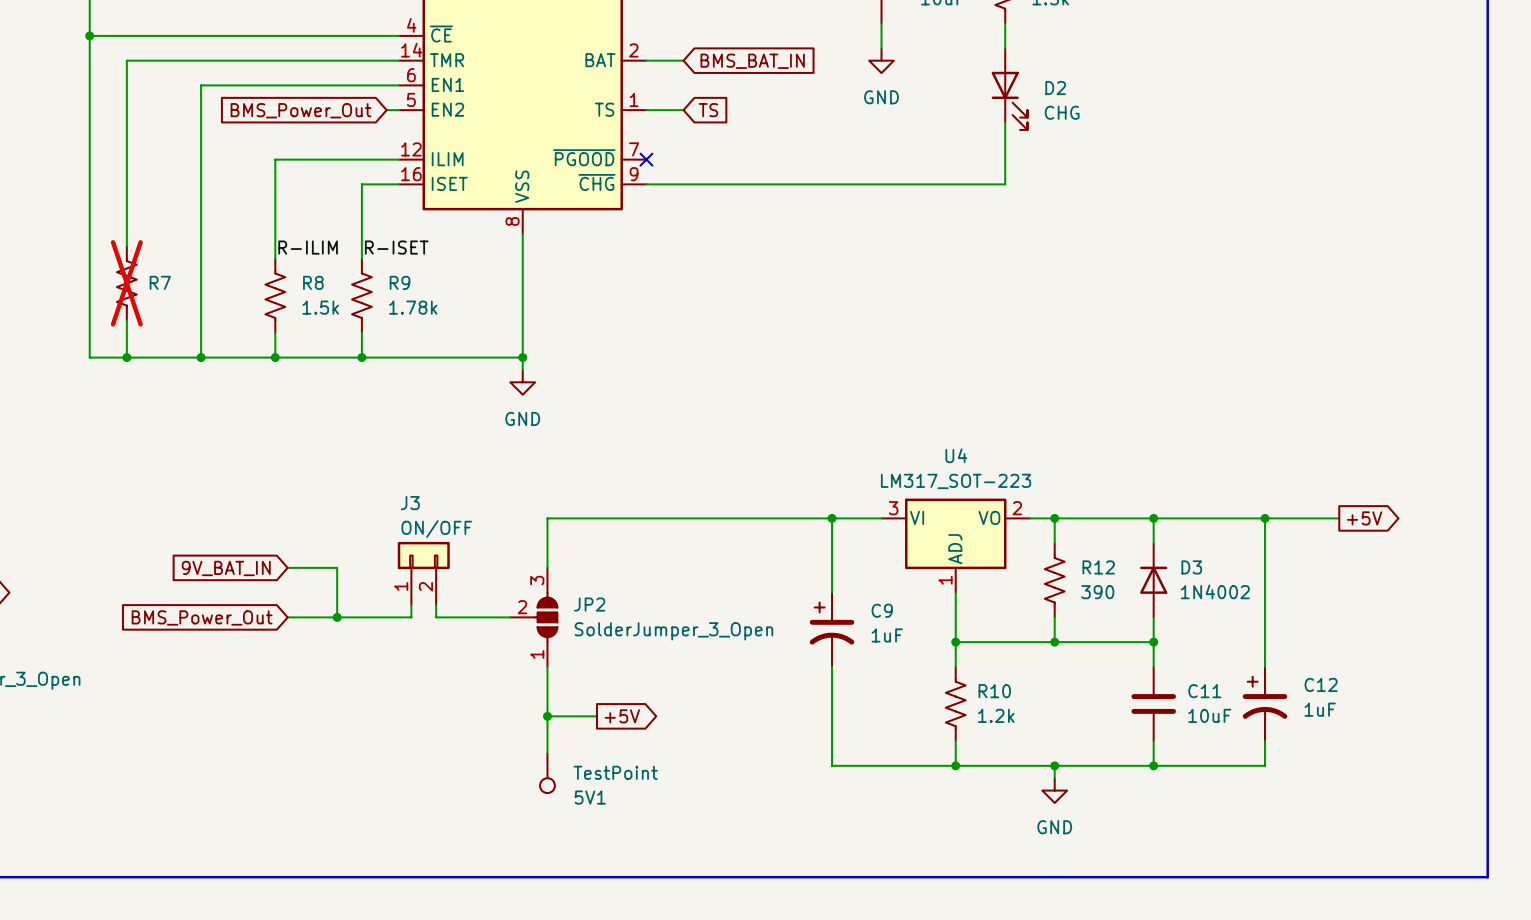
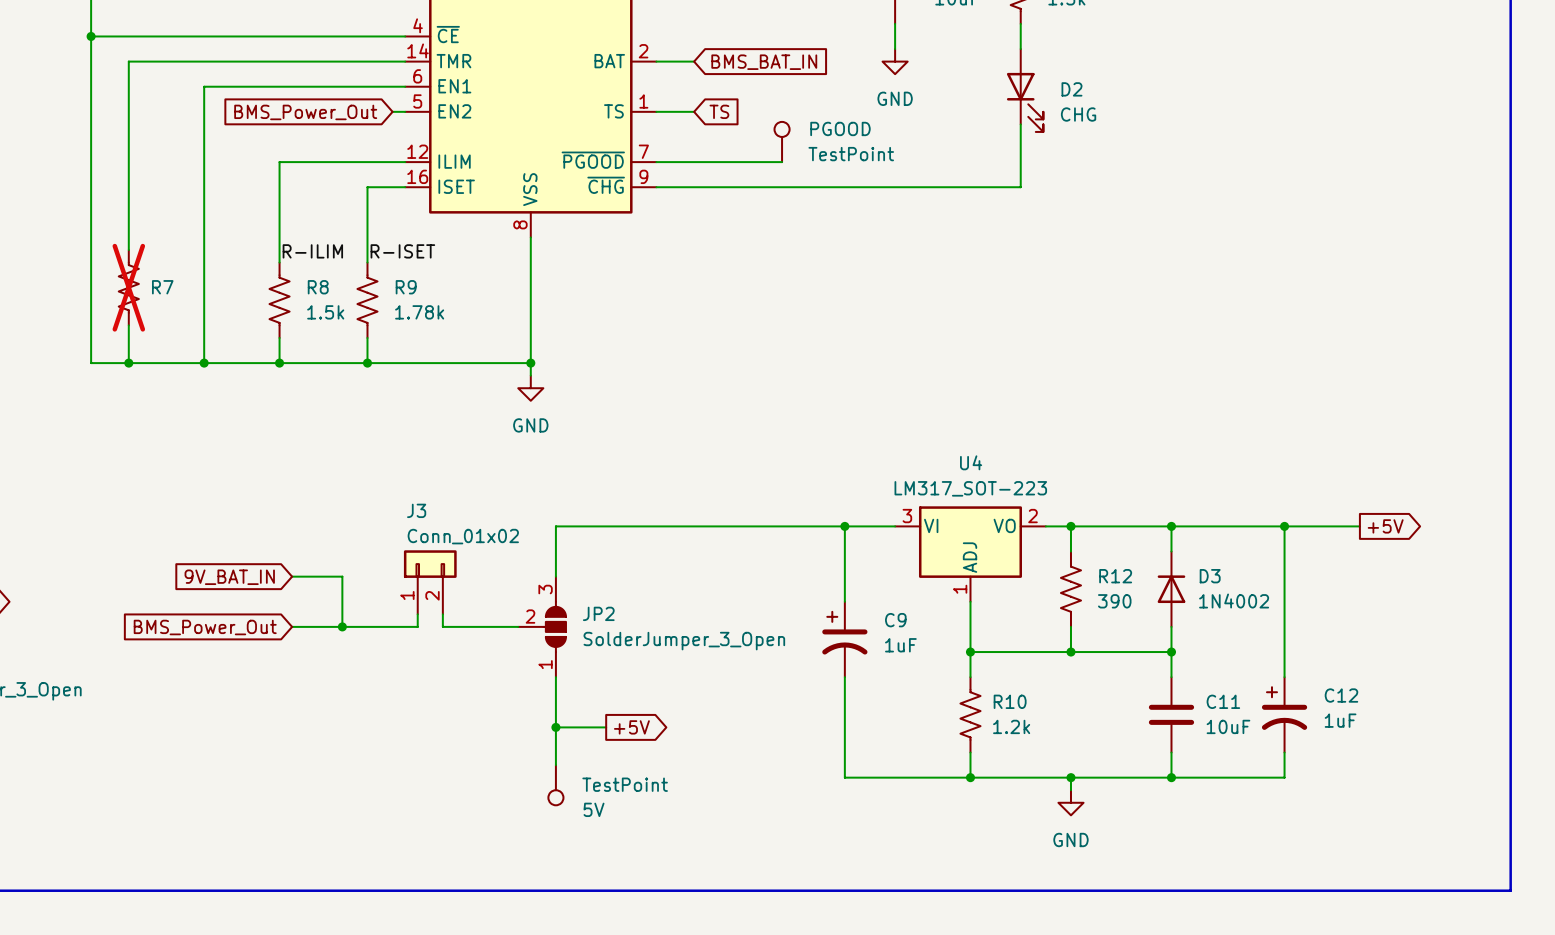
PGOOD: none -> TestPoint (782, 141)
wire: none -> (656, 162) (782, 162)
no-connect mark: (646, 159) -> none
J3 value: ON/OFF (436, 529) -> Conn_01x02 (463, 536)
5V1 name: 5V1 (590, 797) -> 5V (594, 809)

